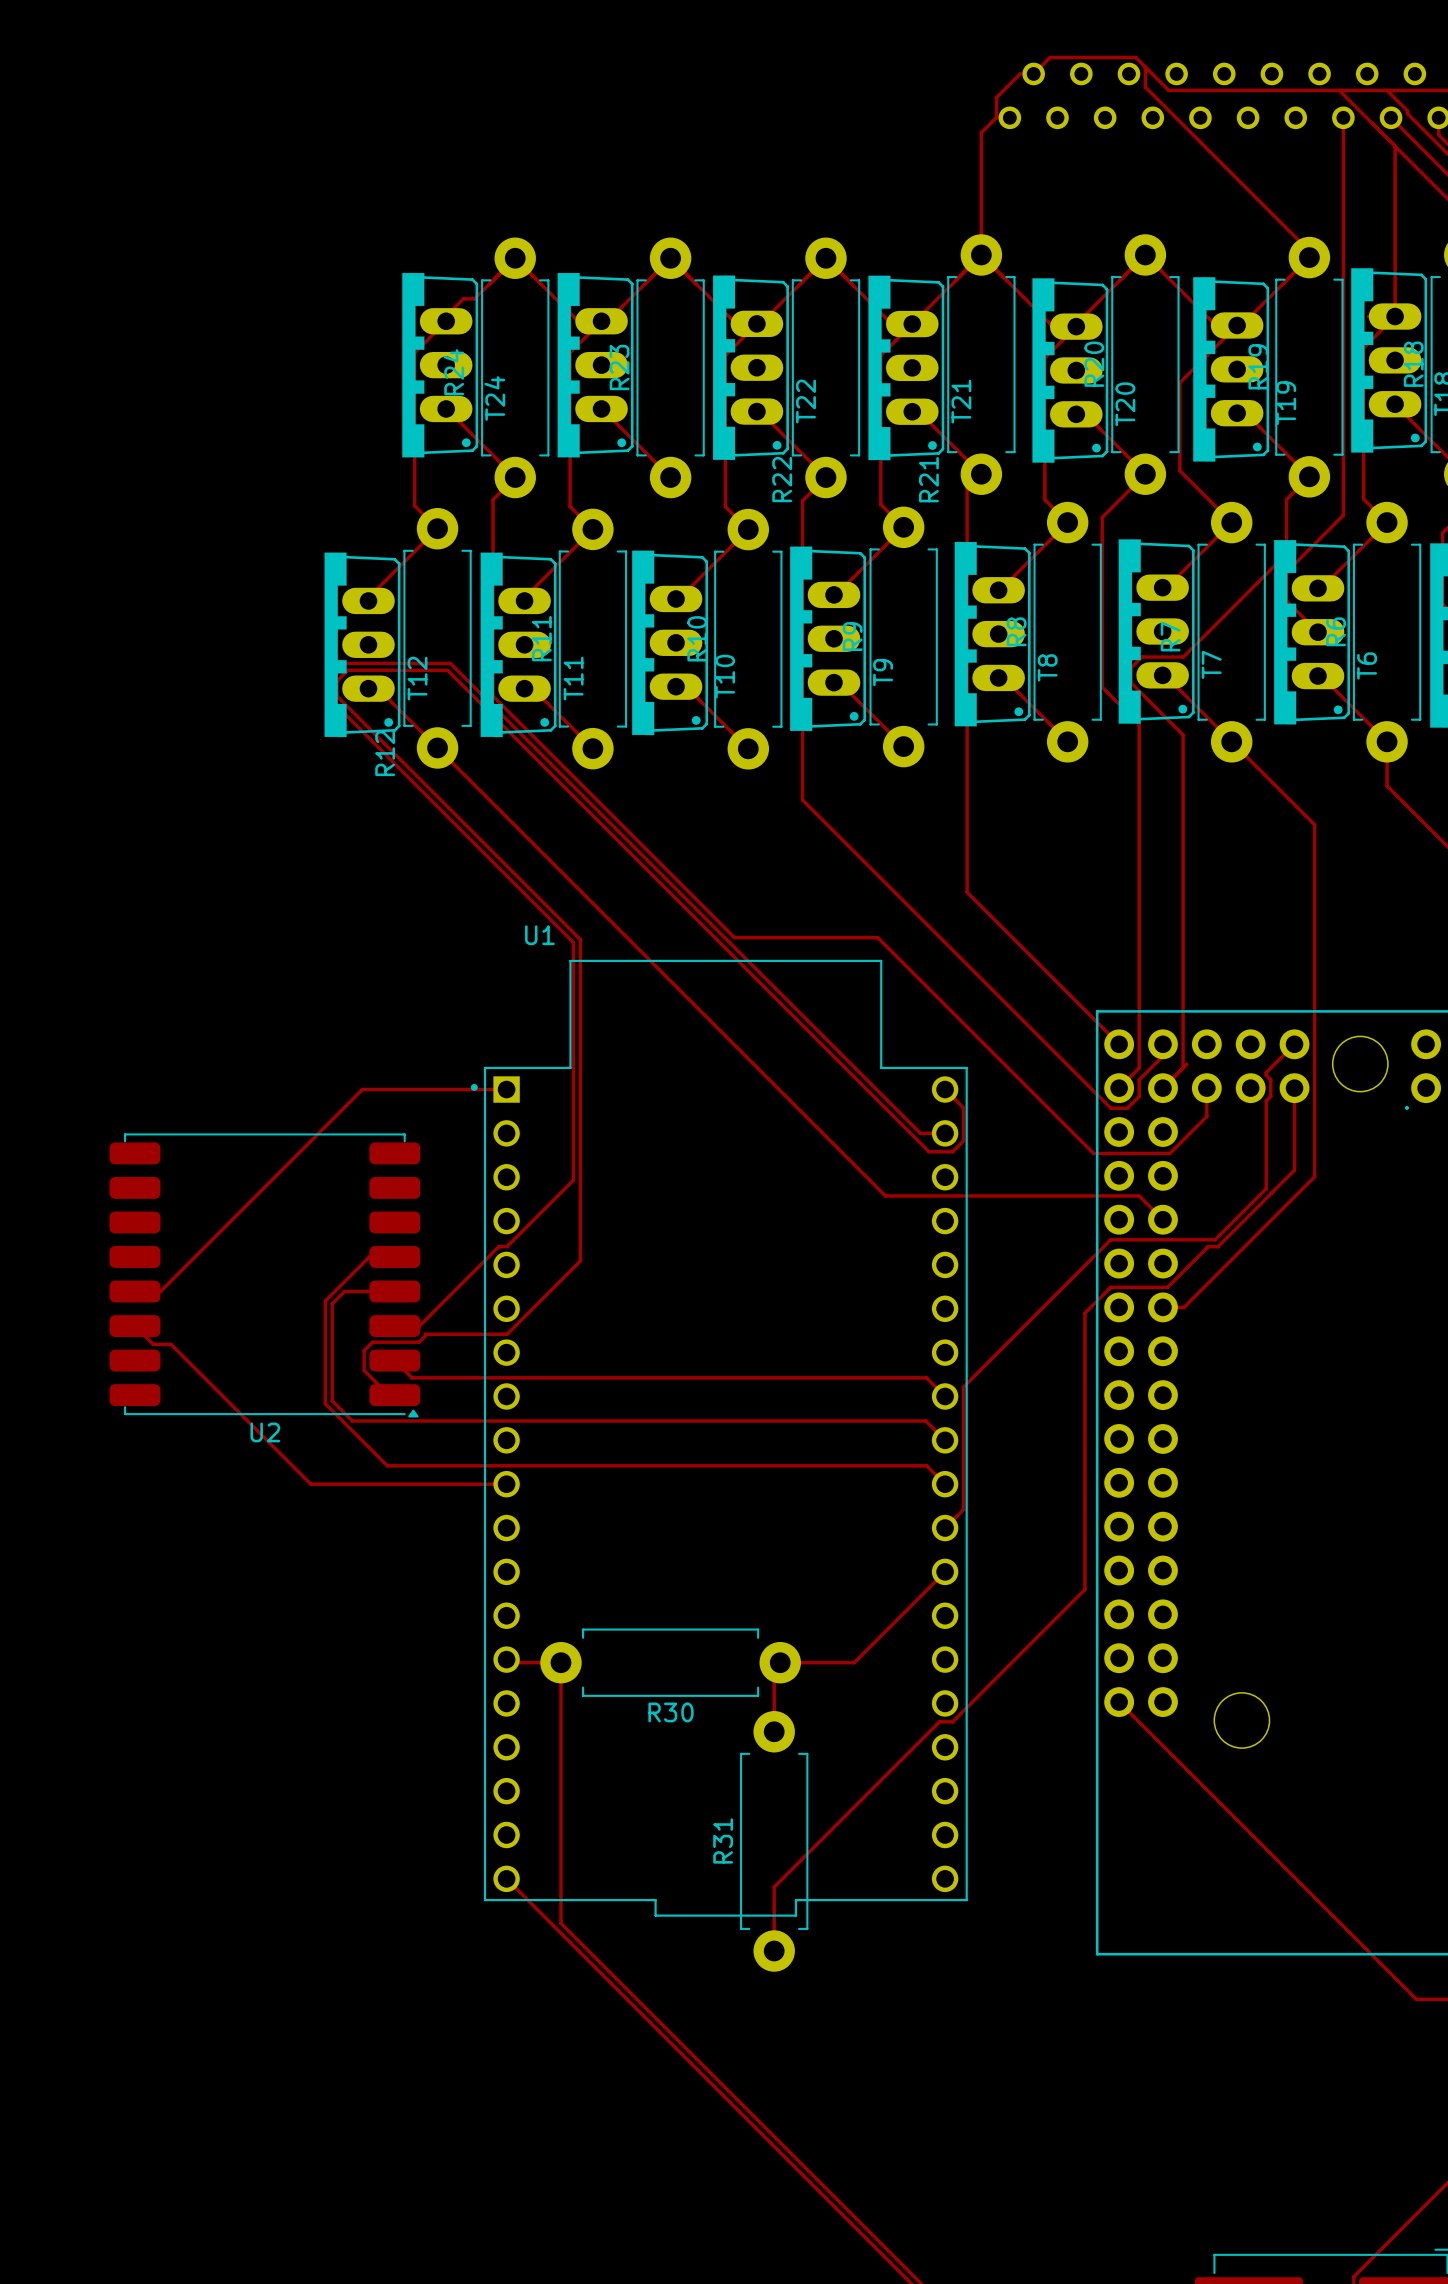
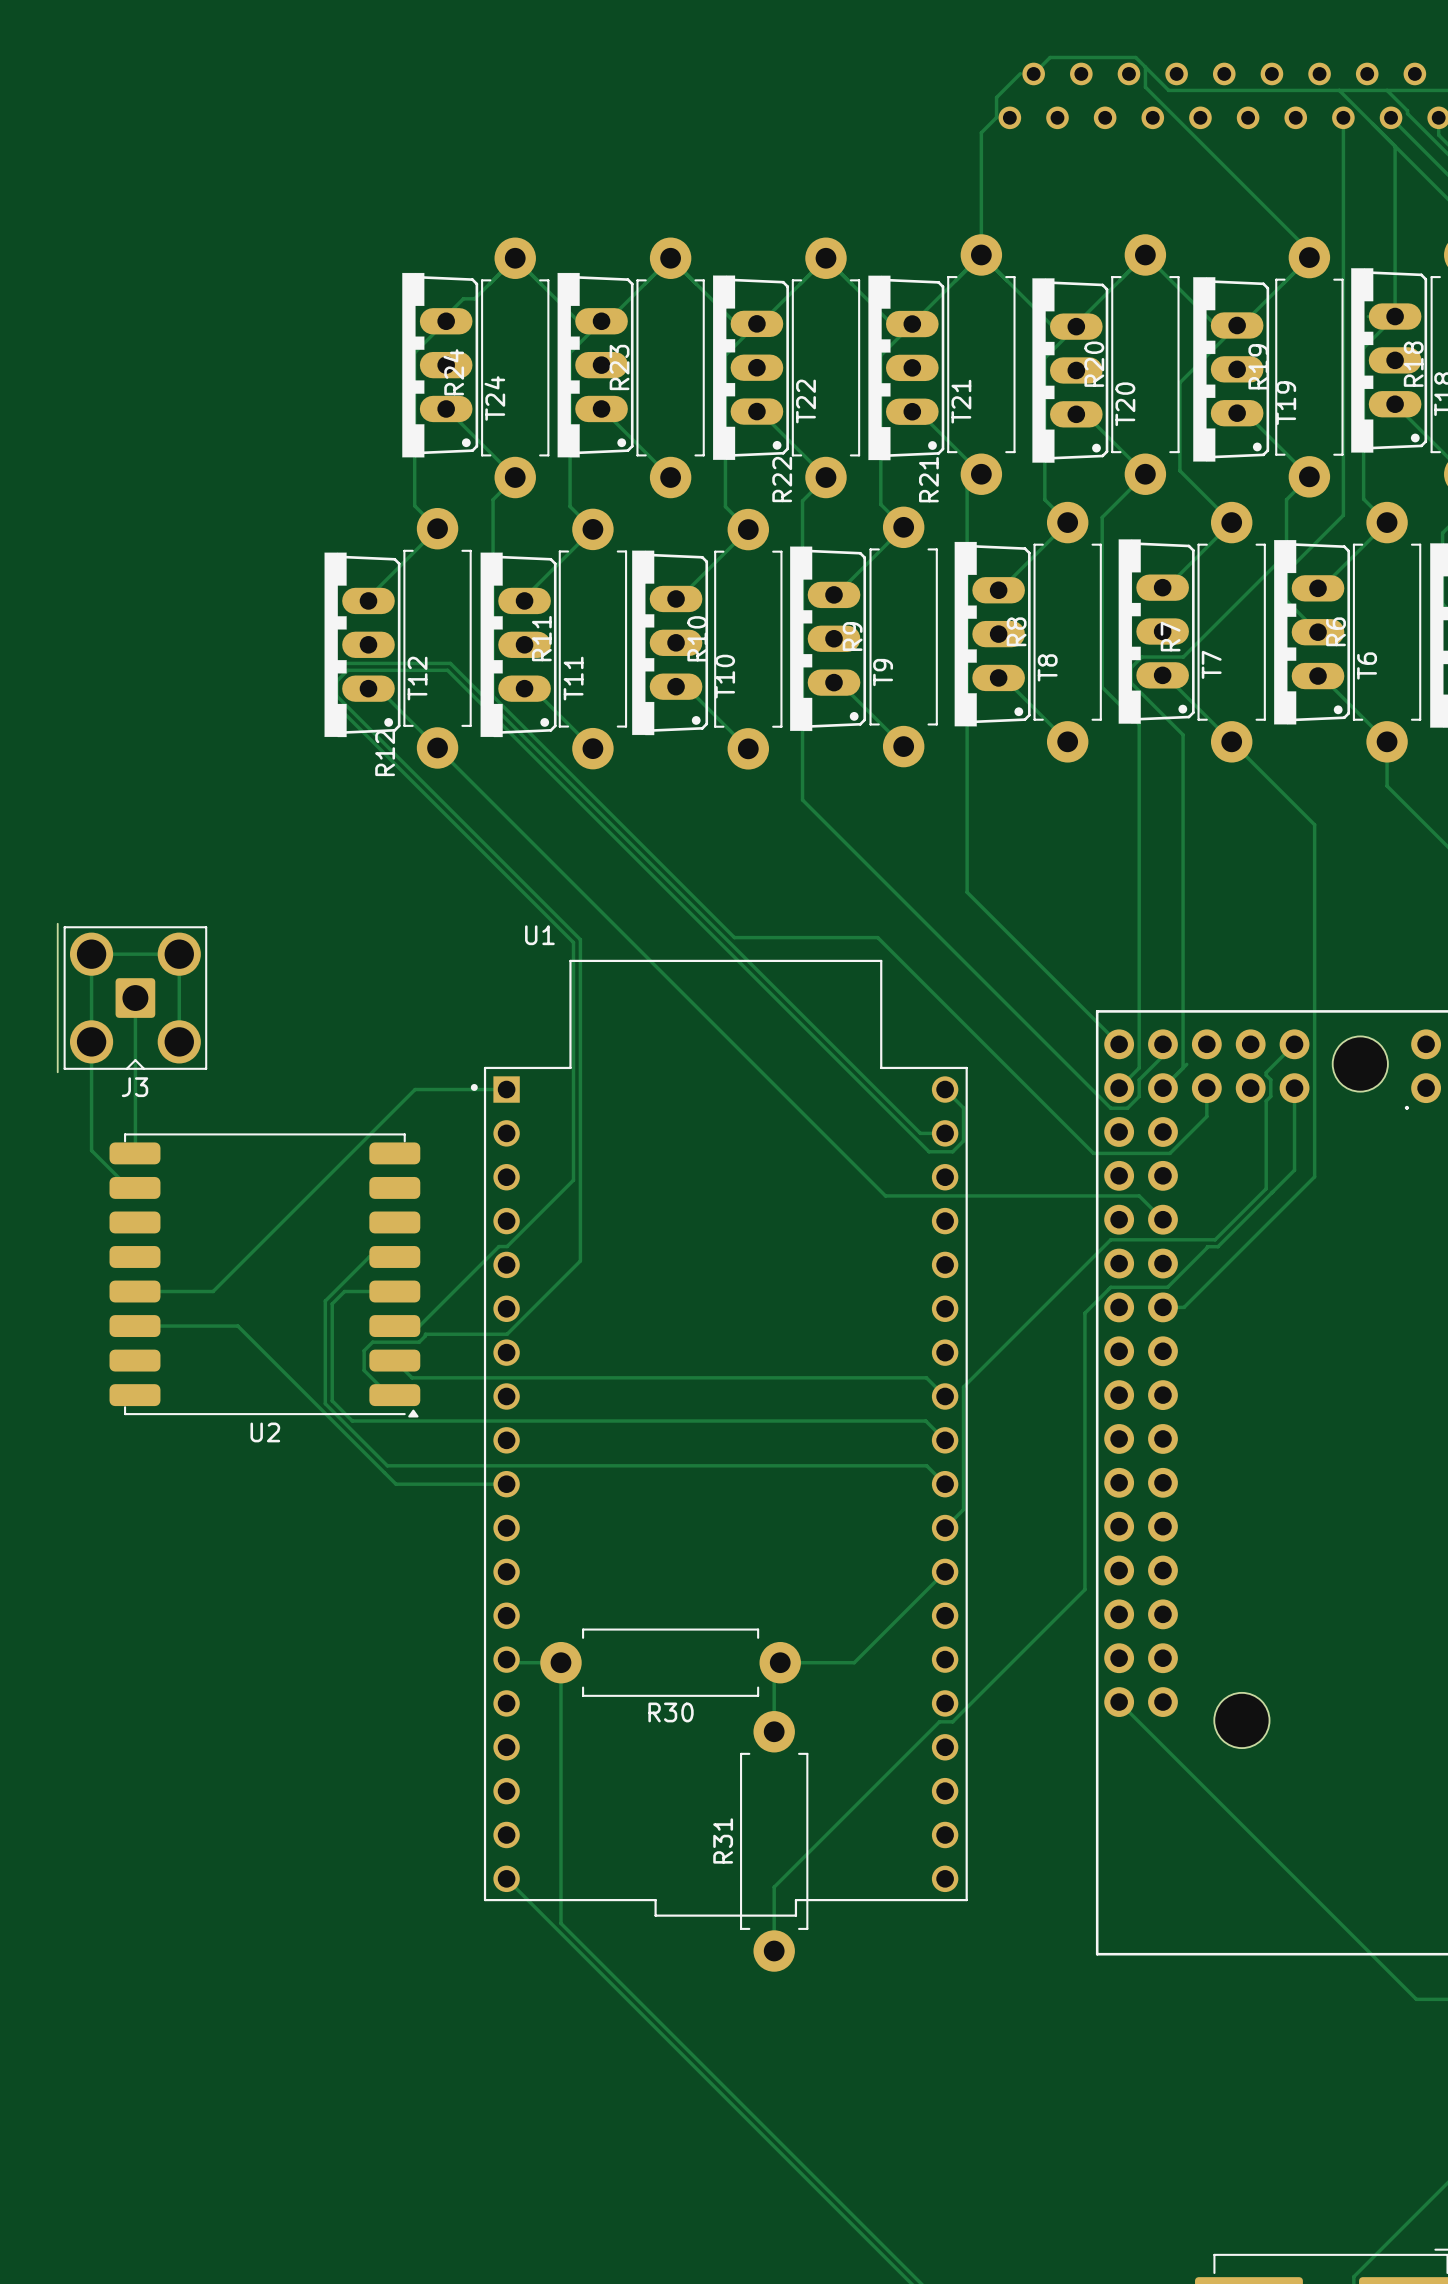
J3: none -> (132, 998)
track: none -> (135, 998) (134, 1153)
track: none -> (179, 1041) (179, 954) (91, 954) (91, 1150) (128, 1187) (134, 1187)
track: (415, 1089) (362, 1089) (160, 1291) -> (415, 1089) (213, 1291) (160, 1291)
track: (134, 1326) (153, 1344) (171, 1344) (310, 1484) (396, 1484) -> (134, 1326) (237, 1326) (396, 1484)

